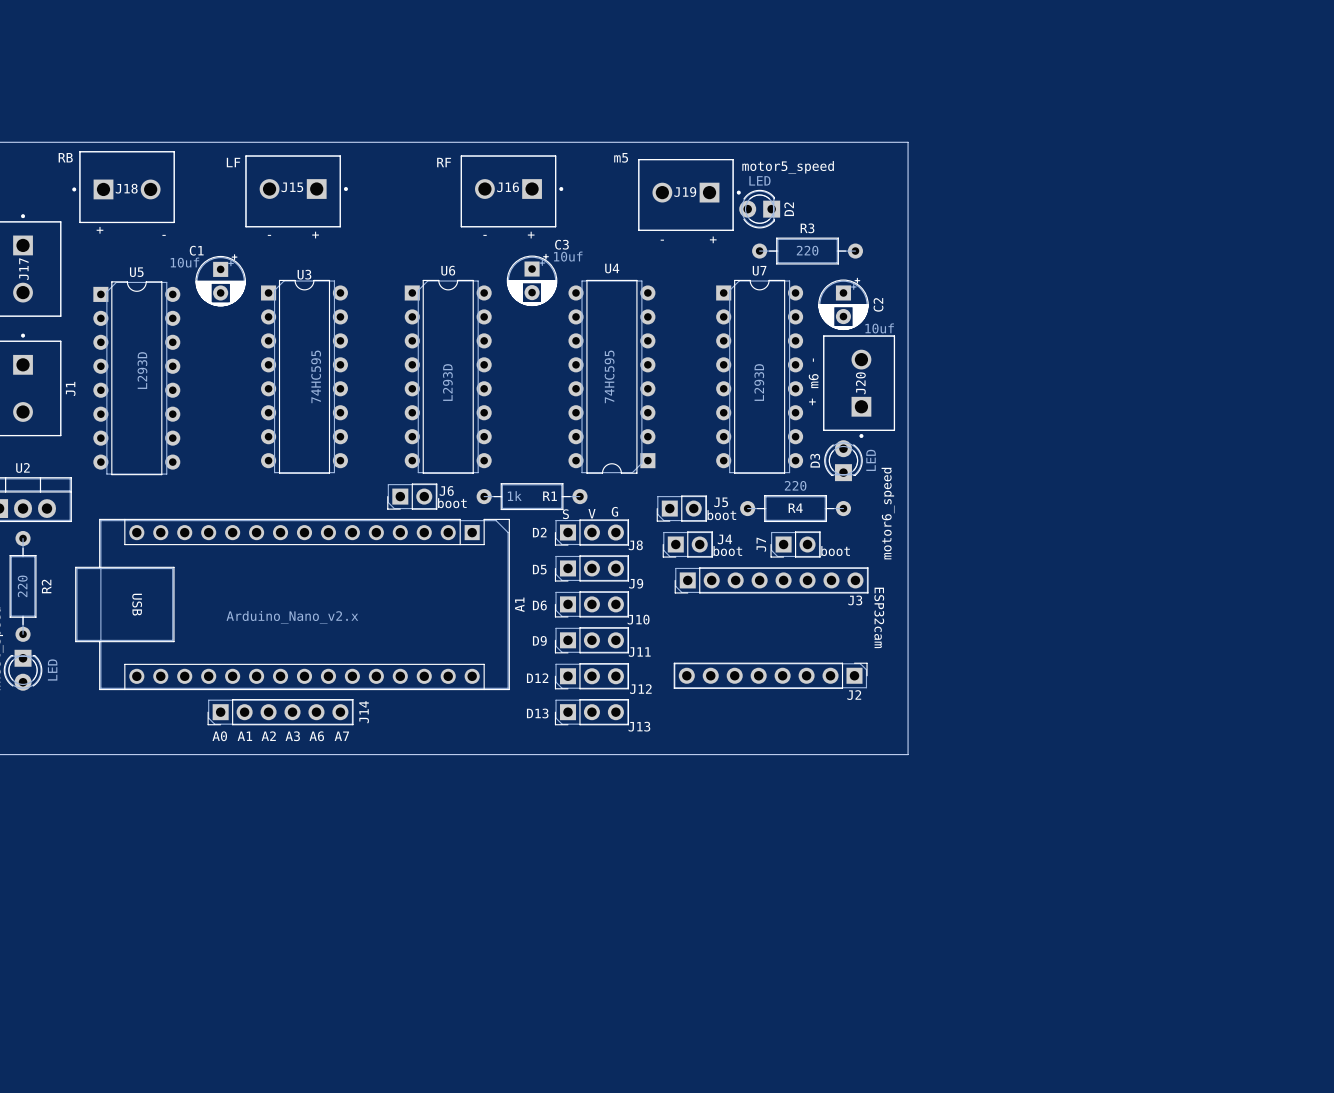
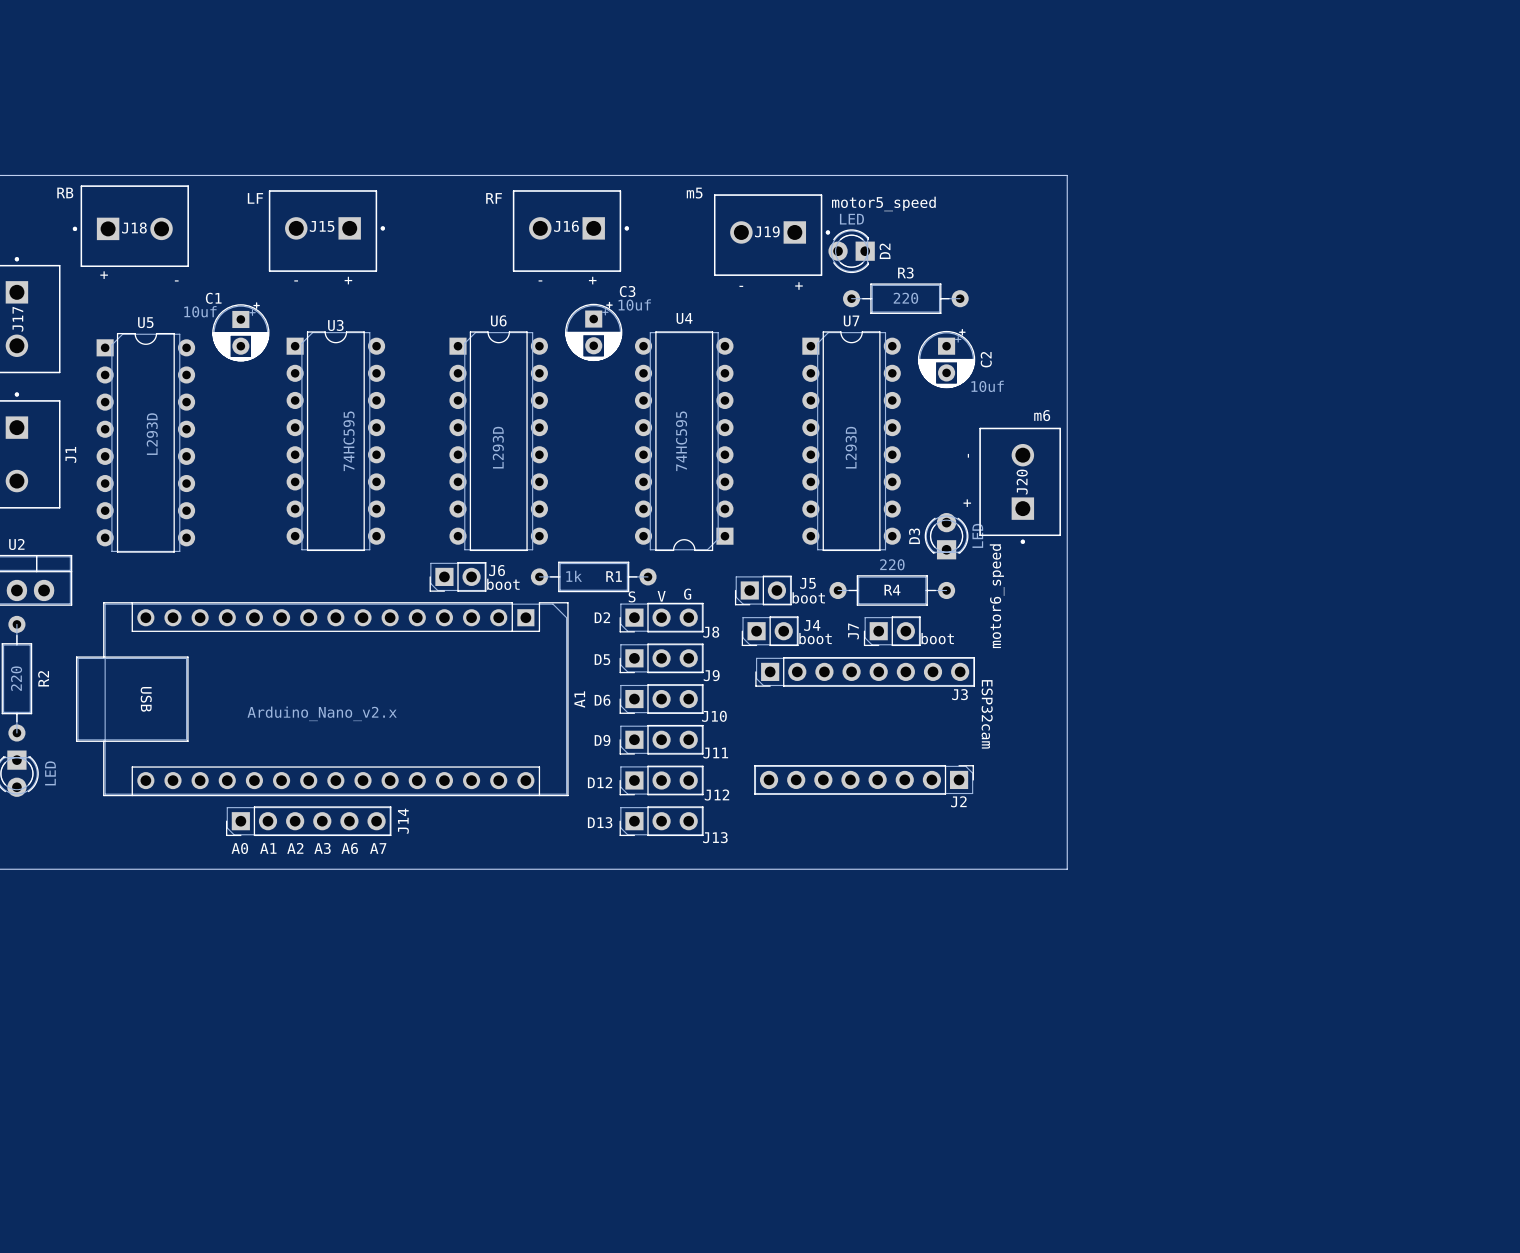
board edge: (908, 142) (908, 754) -> (1019, 175) (1067, 175) (1067, 869) (1019, 869)
text position: - (813, 360) -> - (968, 455)
text rotation: 0° (813, 381) -> 90° clockwise (1042, 415)
text position: m6 (813, 381) -> m6 (1042, 415)
J20 position: (859, 386) -> (1020, 485)
text position: + (812, 401) -> + (967, 503)

